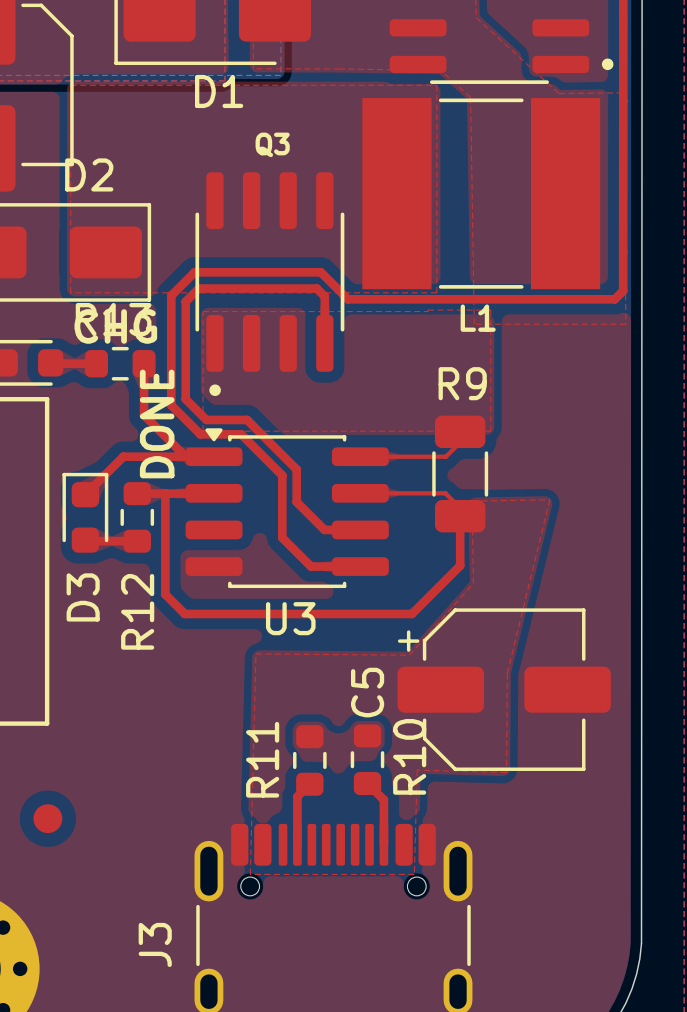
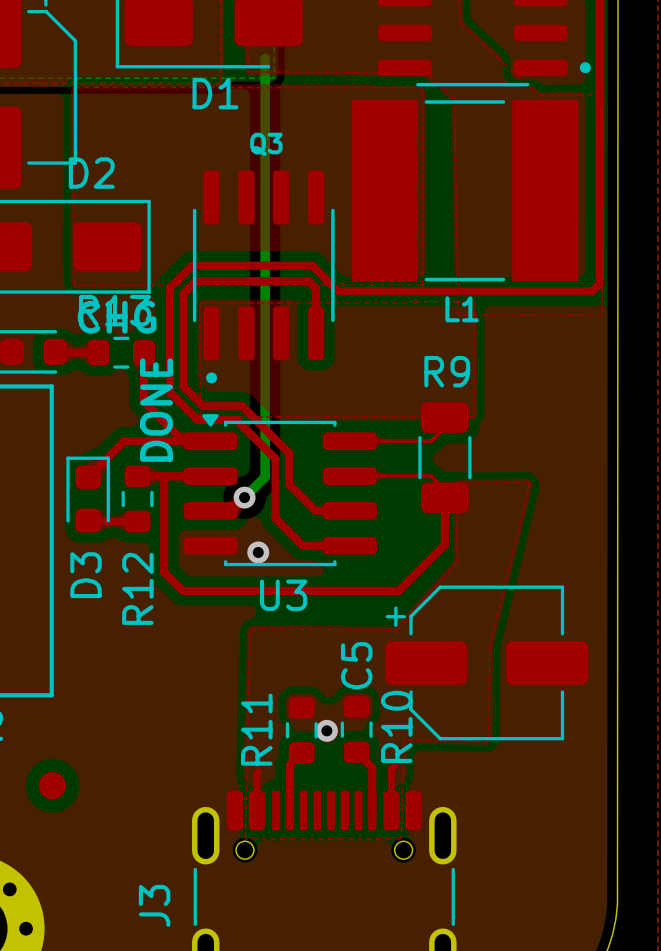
bottom track: none -> (265, 58) (265, 477) (244, 497)
via: none -> (244, 497)
via: none -> (258, 552)
via: none -> (326, 730)
top track: none -> (395, 765) (391, 769) (391, 810)
top track: none -> (258, 772) (257, 810)

